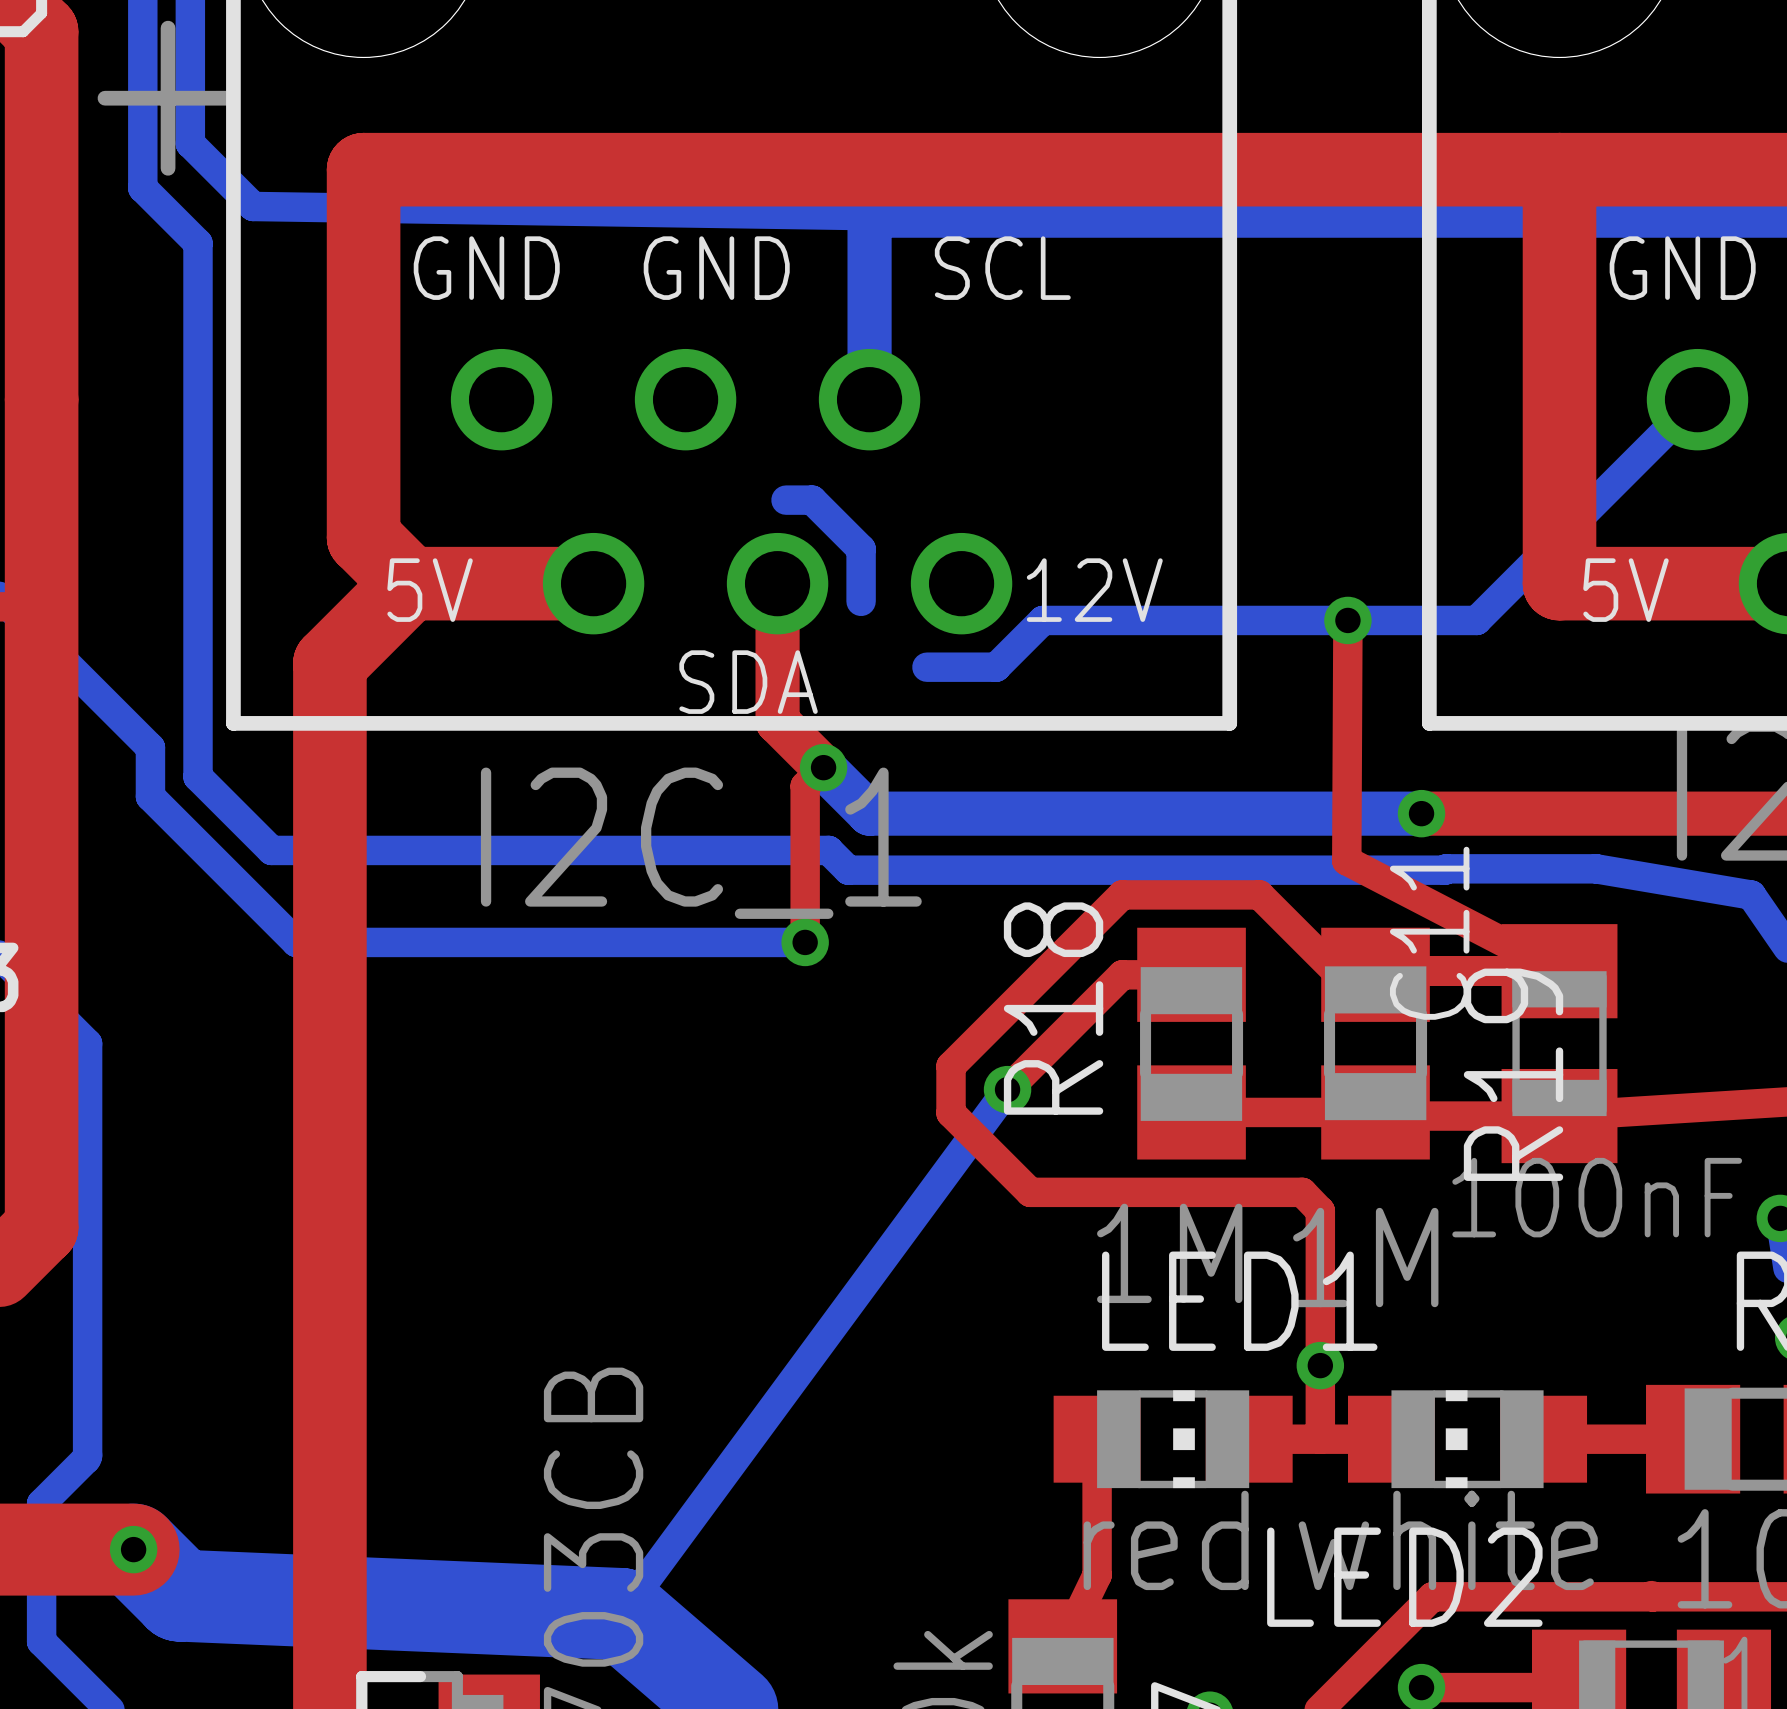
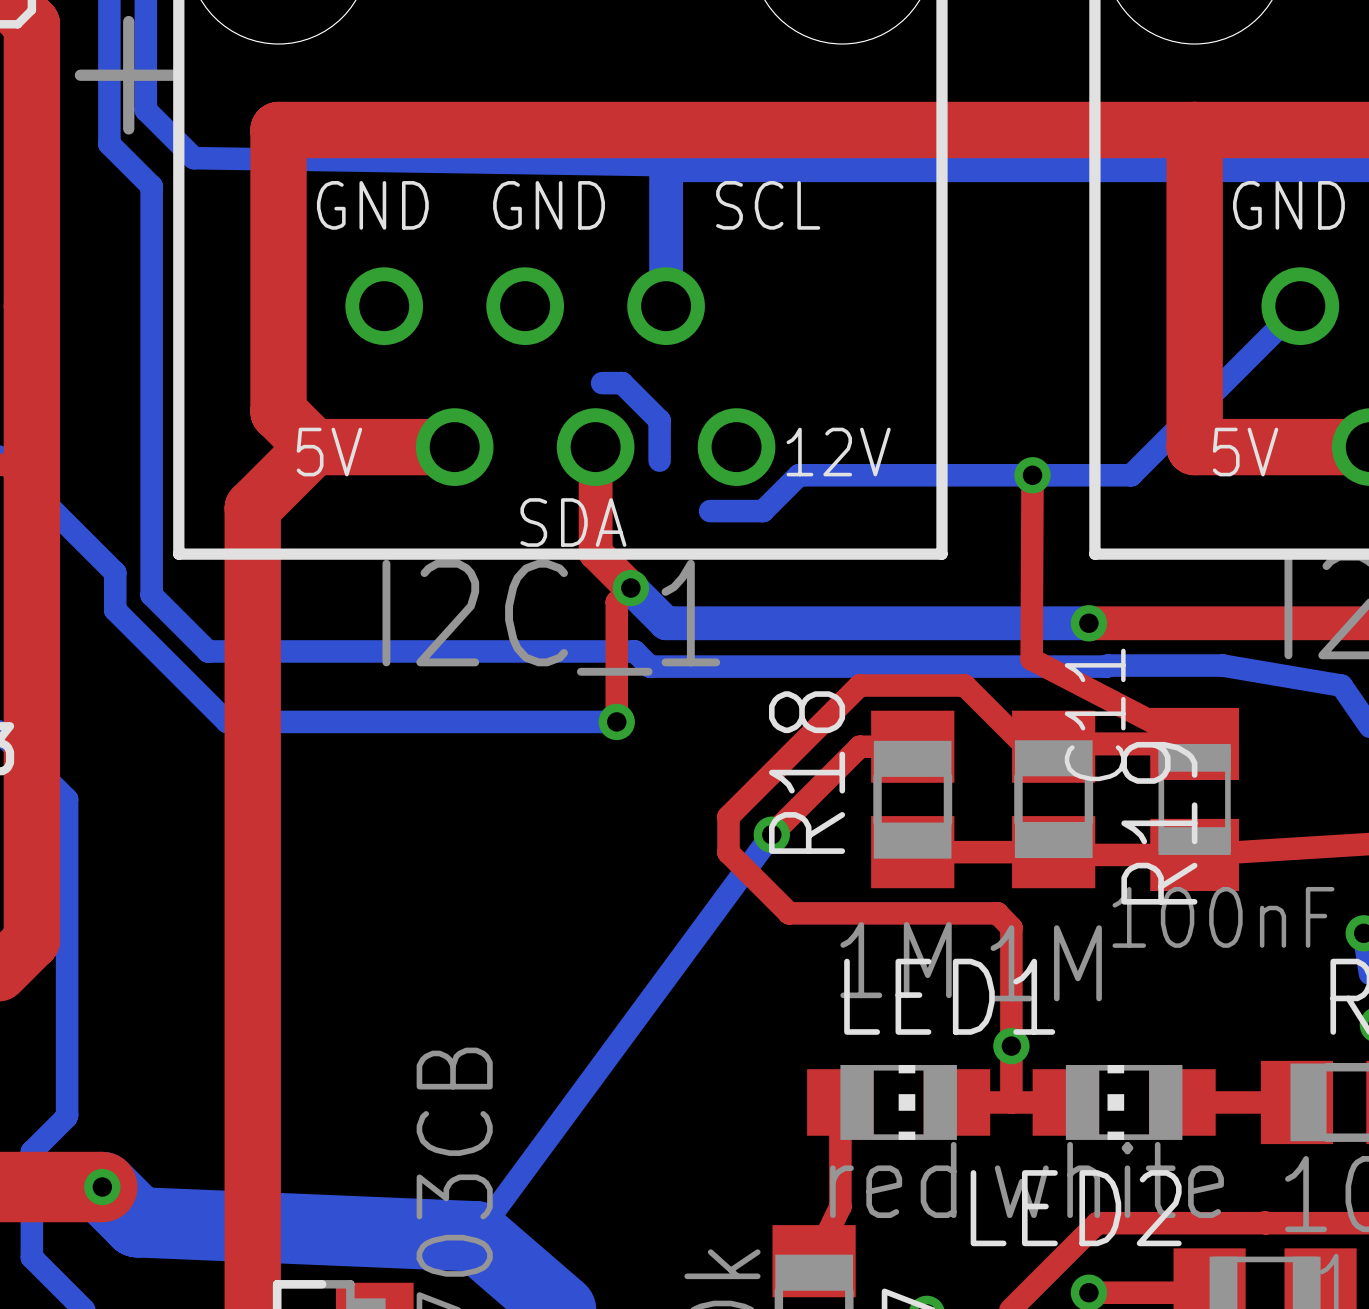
text position: I2C_1 (701, 843) -> I2C_1 (551, 617)

